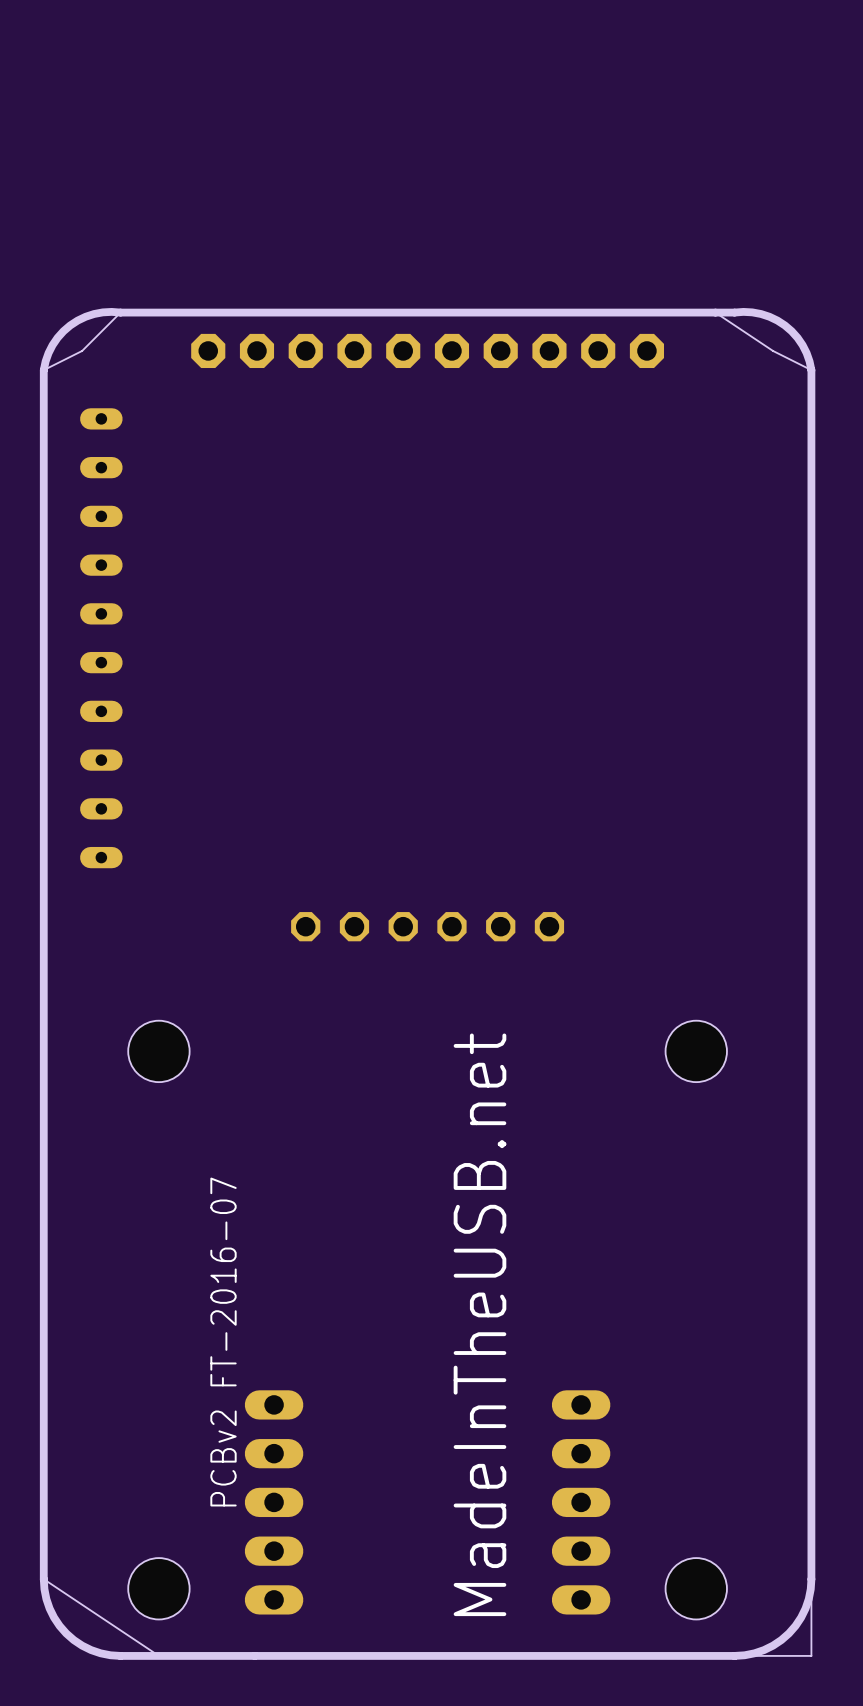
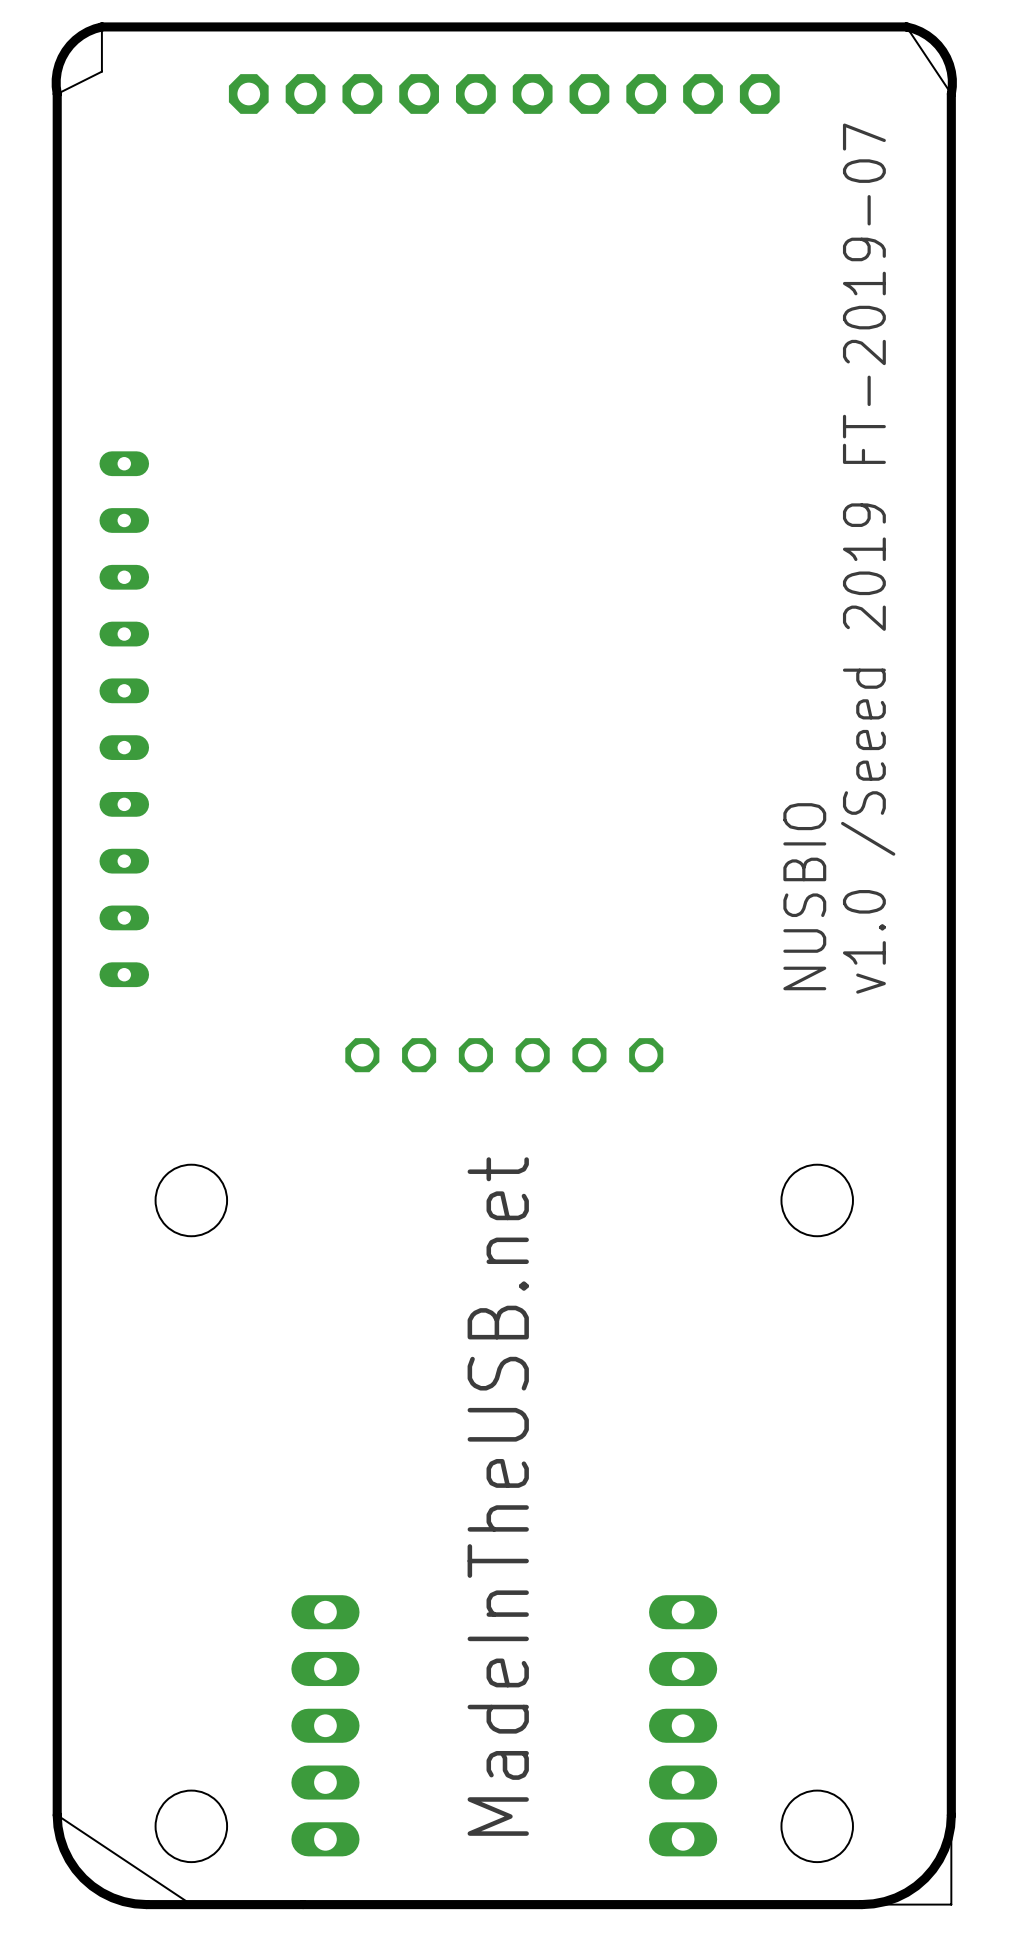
board edge: none -> (101, 26) (101, 71) (57, 93)
board edge: none -> (101, 26) (81, 35) (65, 51) (57, 71) (57, 93)
board edge: none -> (906, 26) (951, 93)
board edge: none -> (906, 26) (101, 26)
board edge: none -> (906, 26) (927, 35) (942, 51) (951, 71) (951, 93)
board edge: none -> (57, 93) (57, 406)
board edge: none -> (951, 93) (951, 406)
board edge: (120, 312) (82, 350) (43, 370) (52, 345) (70, 325) (94, 314) (120, 312) -> none
board edge: (715, 312) (773, 350) (811, 370) (806, 353) (791, 331) (769, 316) (752, 312) (120, 312) -> none
part position: (427, 350) -> (504, 93)
text: none -> v1.0 /Seeed 2019 FT-2019-07 (868, 558)
text: none -> NUSBIO (804, 896)
text position: MadeInTheUSB.net (479, 1324) -> MadeInTheUSB.net (498, 1496)
text: PCBv2 FT-2016-07 (223, 1342) -> none

